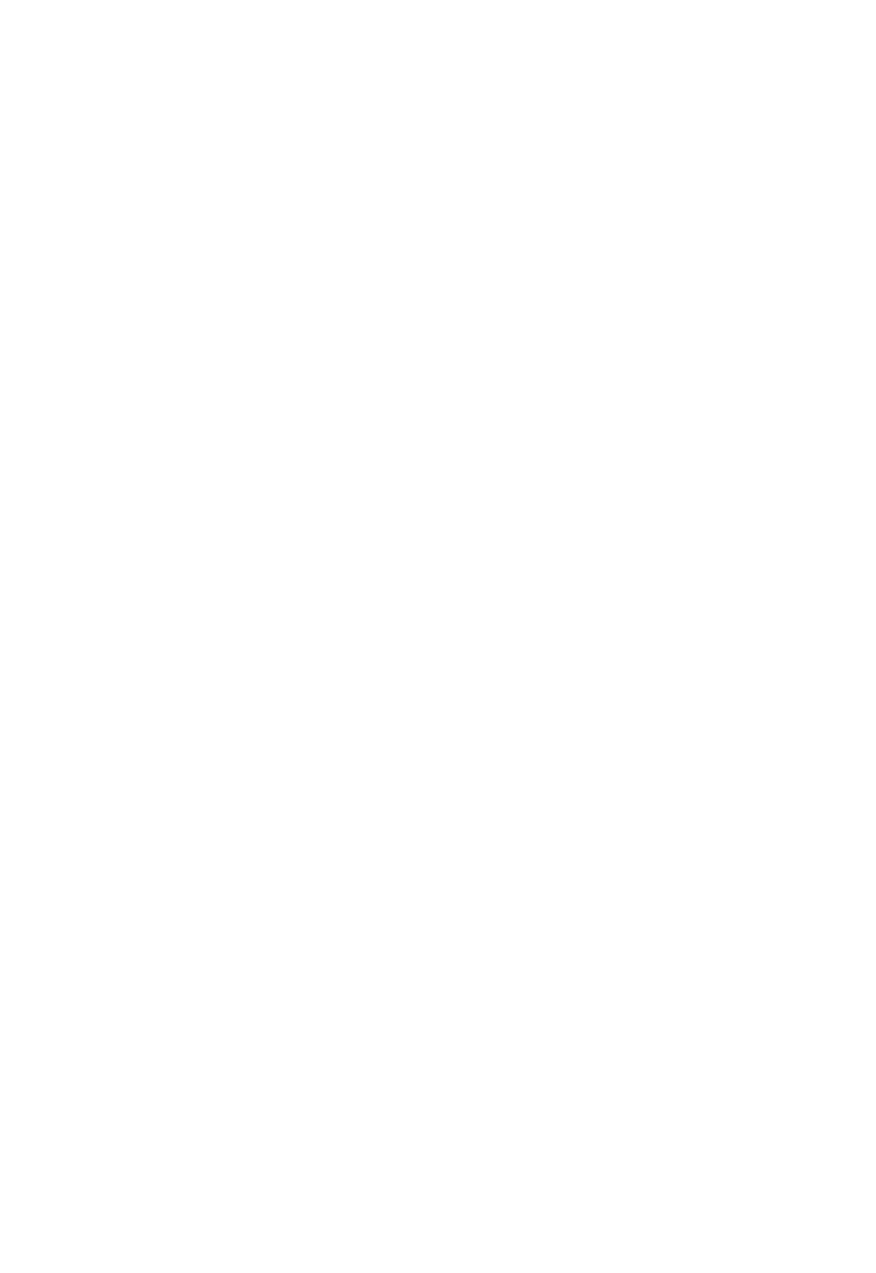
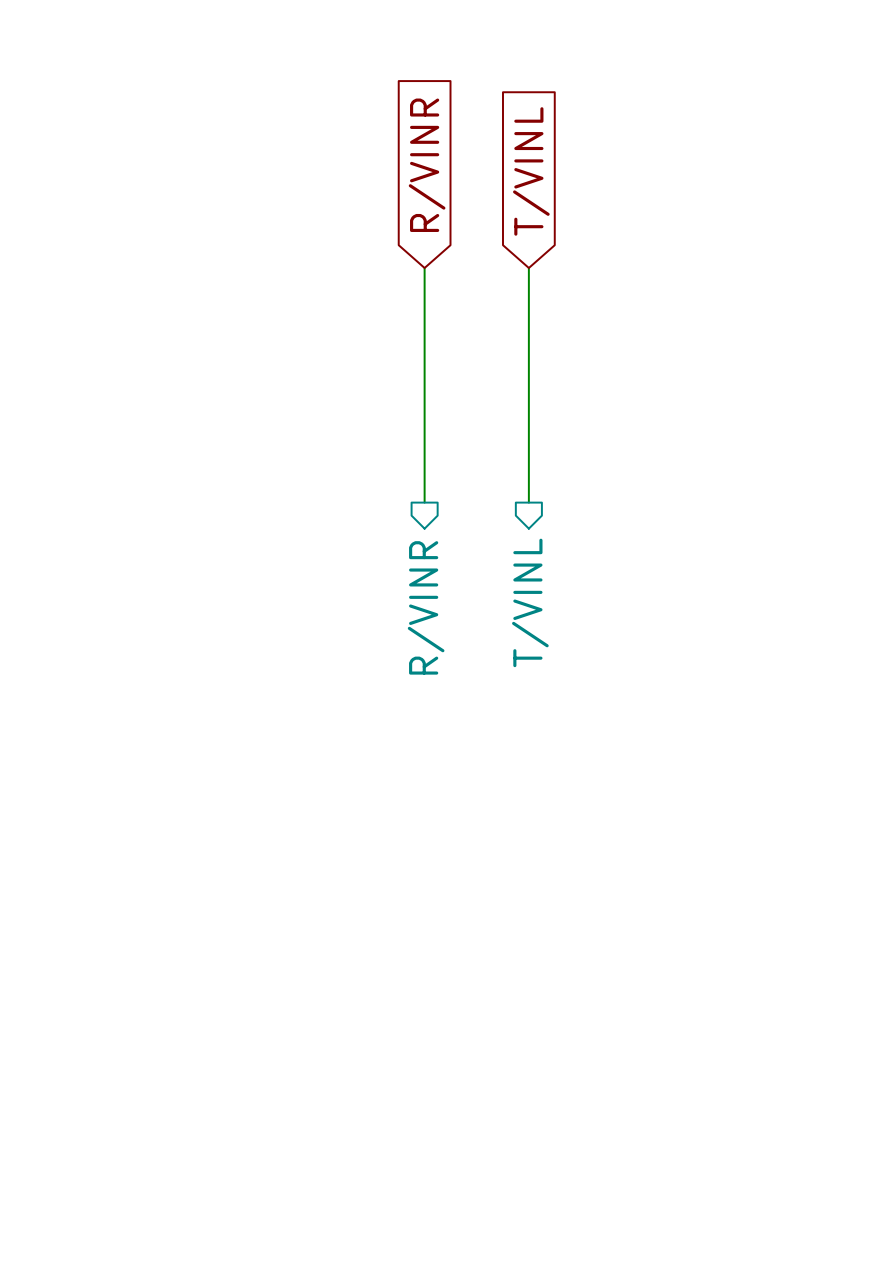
global label: none -> R/VINR (427, 165)
global label: none -> T/VINL (531, 171)
wire: none -> (424, 268) (424, 502)
wire: none -> (528, 268) (528, 502)
sheet pin: none -> T/VINL (530, 602)
sheet pin: none -> R/VINR (426, 607)

